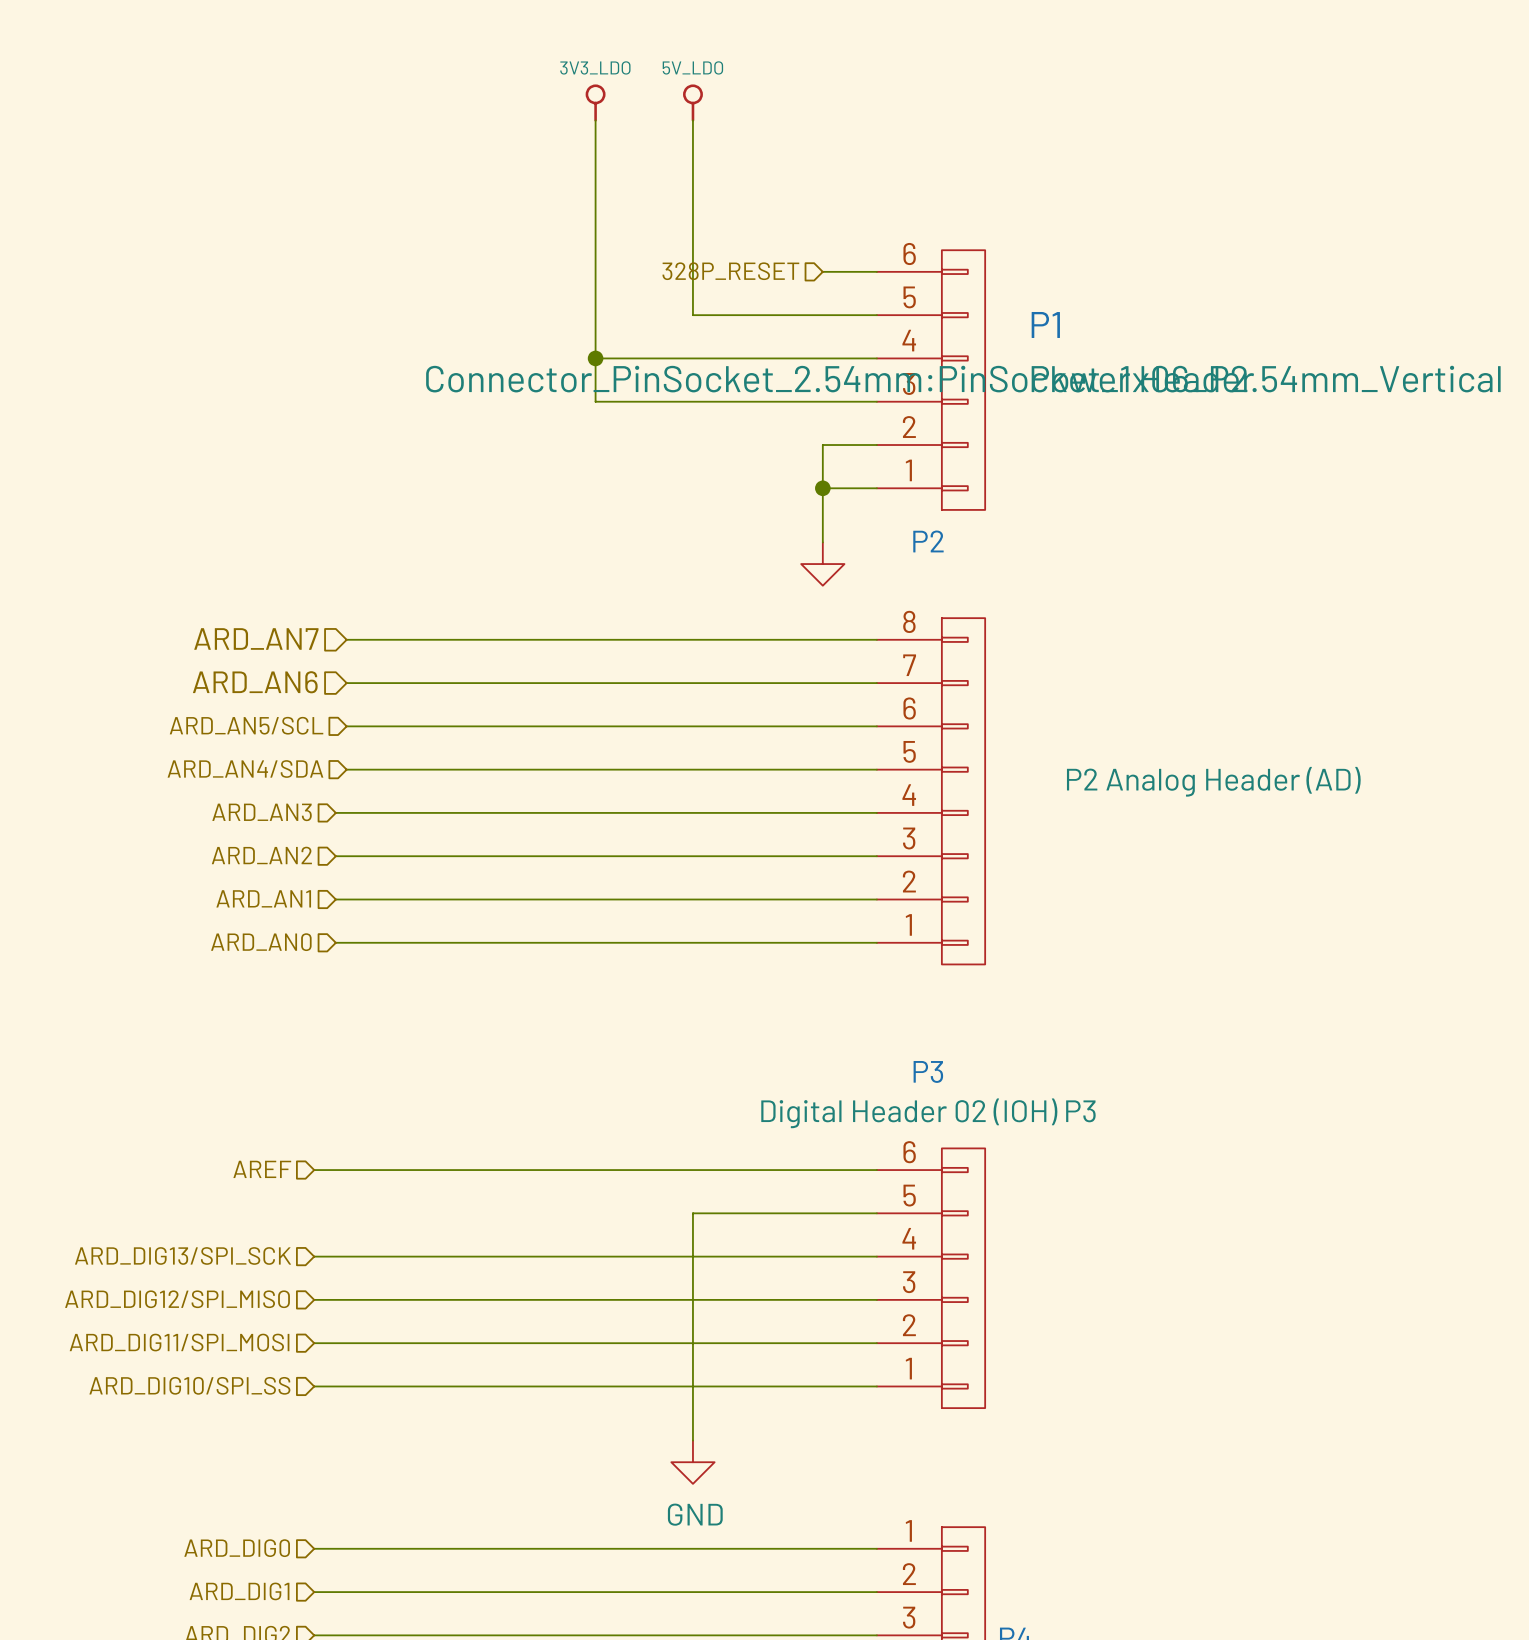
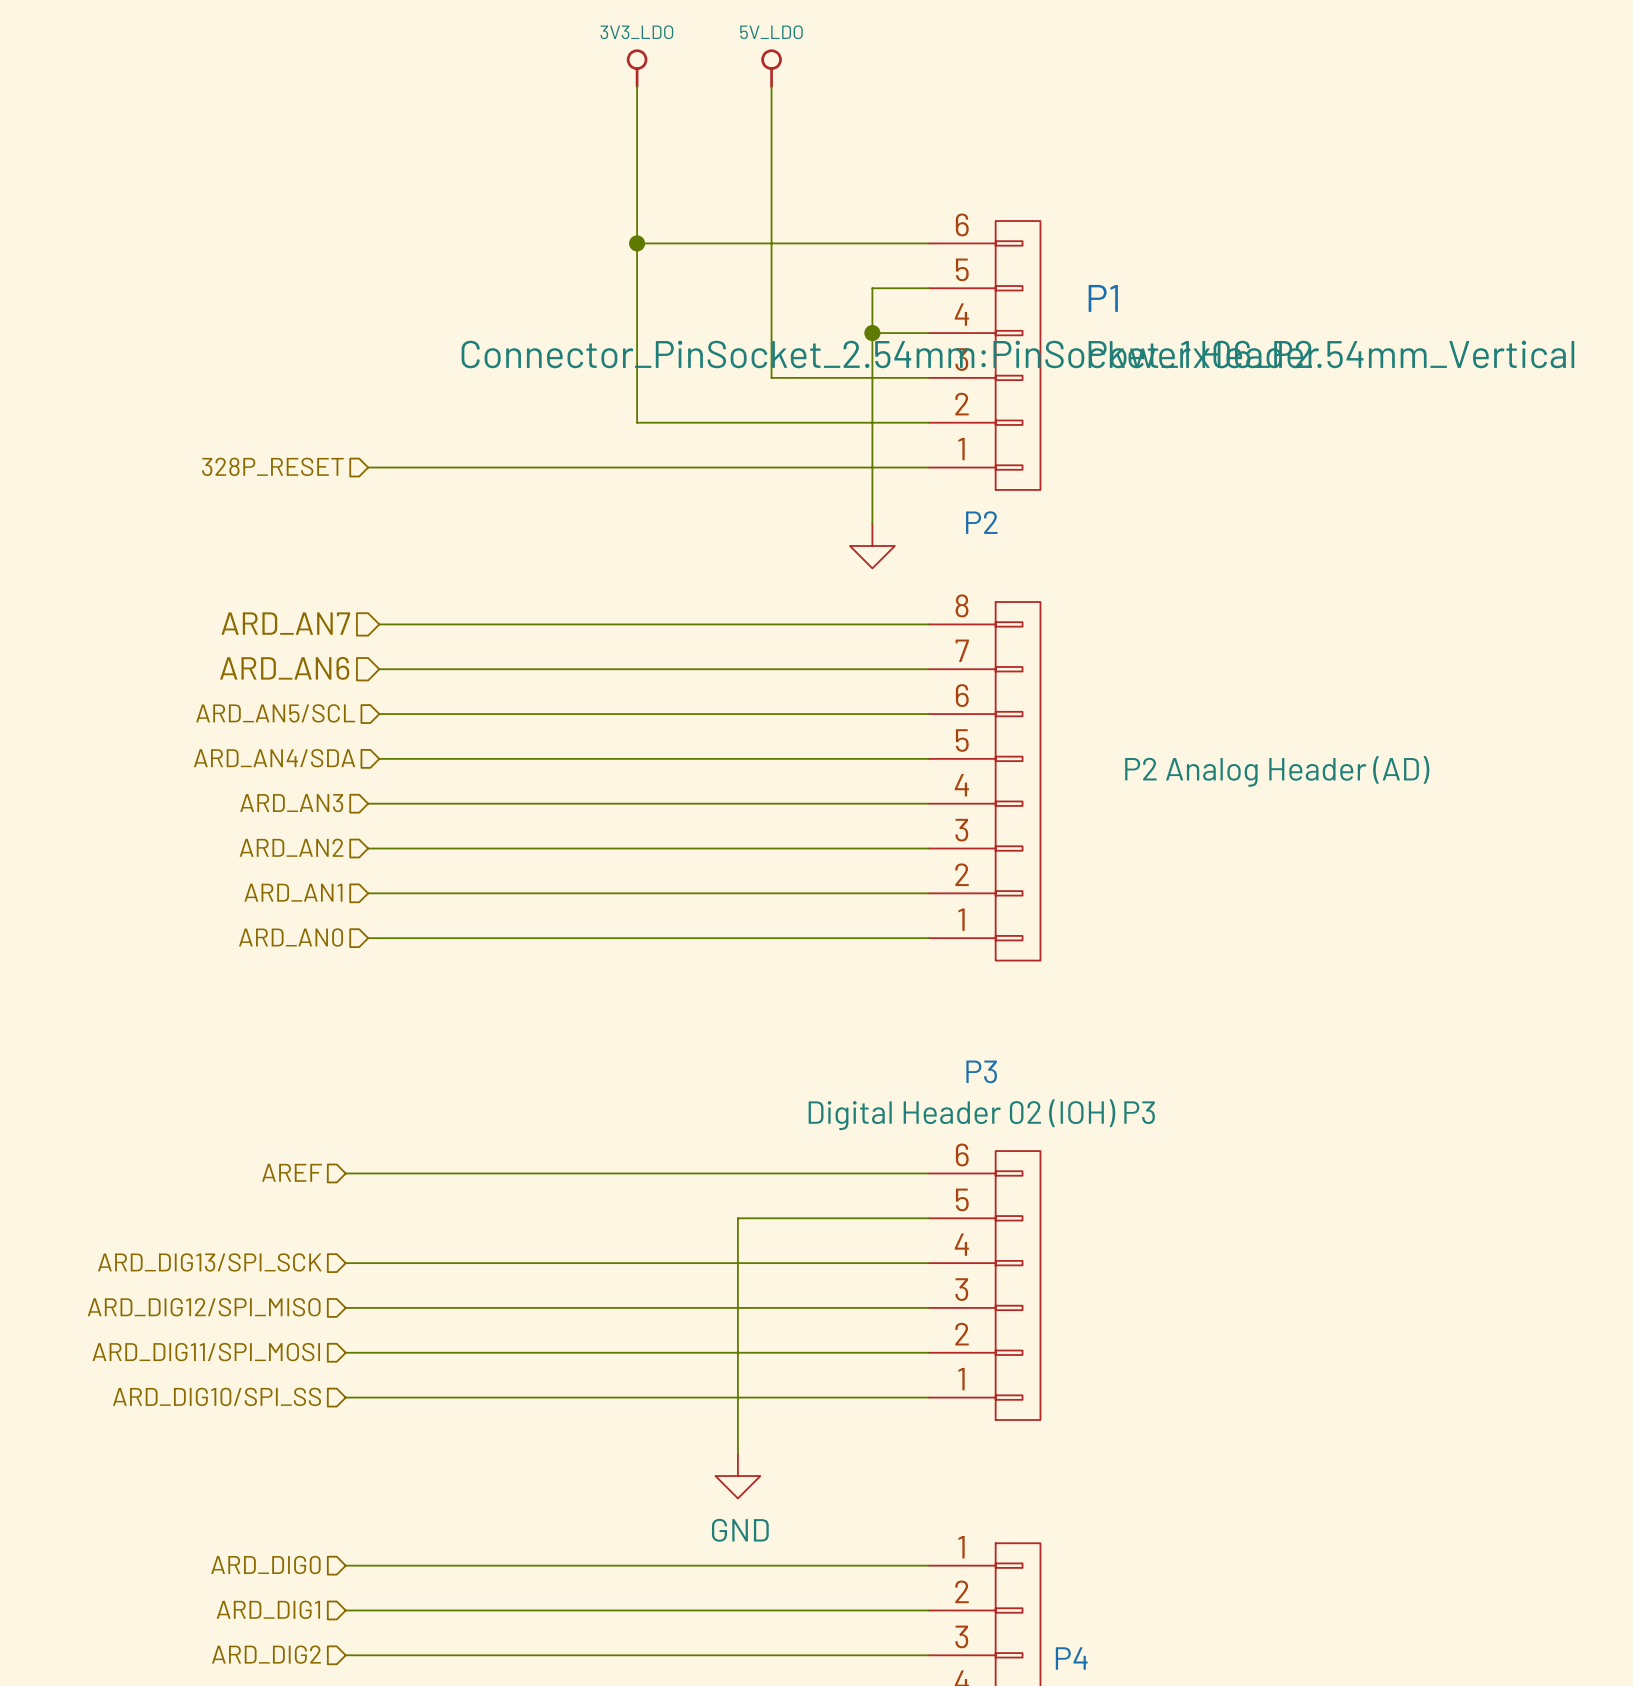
power symbol position: 5V_LDO (692, 103) -> 5V_LDO (771, 68)
wire: (692, 120) (692, 315) (822, 315) -> none
wire: none -> (771, 86) (771, 377)
hierarchical label: 328P_RESET (730, 271) -> none
wire: (595, 358) (822, 358) -> (637, 243) (872, 243)
junction position: (595, 358) -> (637, 243)
junction: none -> (872, 333)
wire: (595, 401) (725, 401) -> (637, 377) (637, 422) (872, 422) (872, 288)
hierarchical label: none -> 328P_RESET (272, 466)
wire: none -> (368, 467) (872, 467)
junction: (822, 488) -> none

